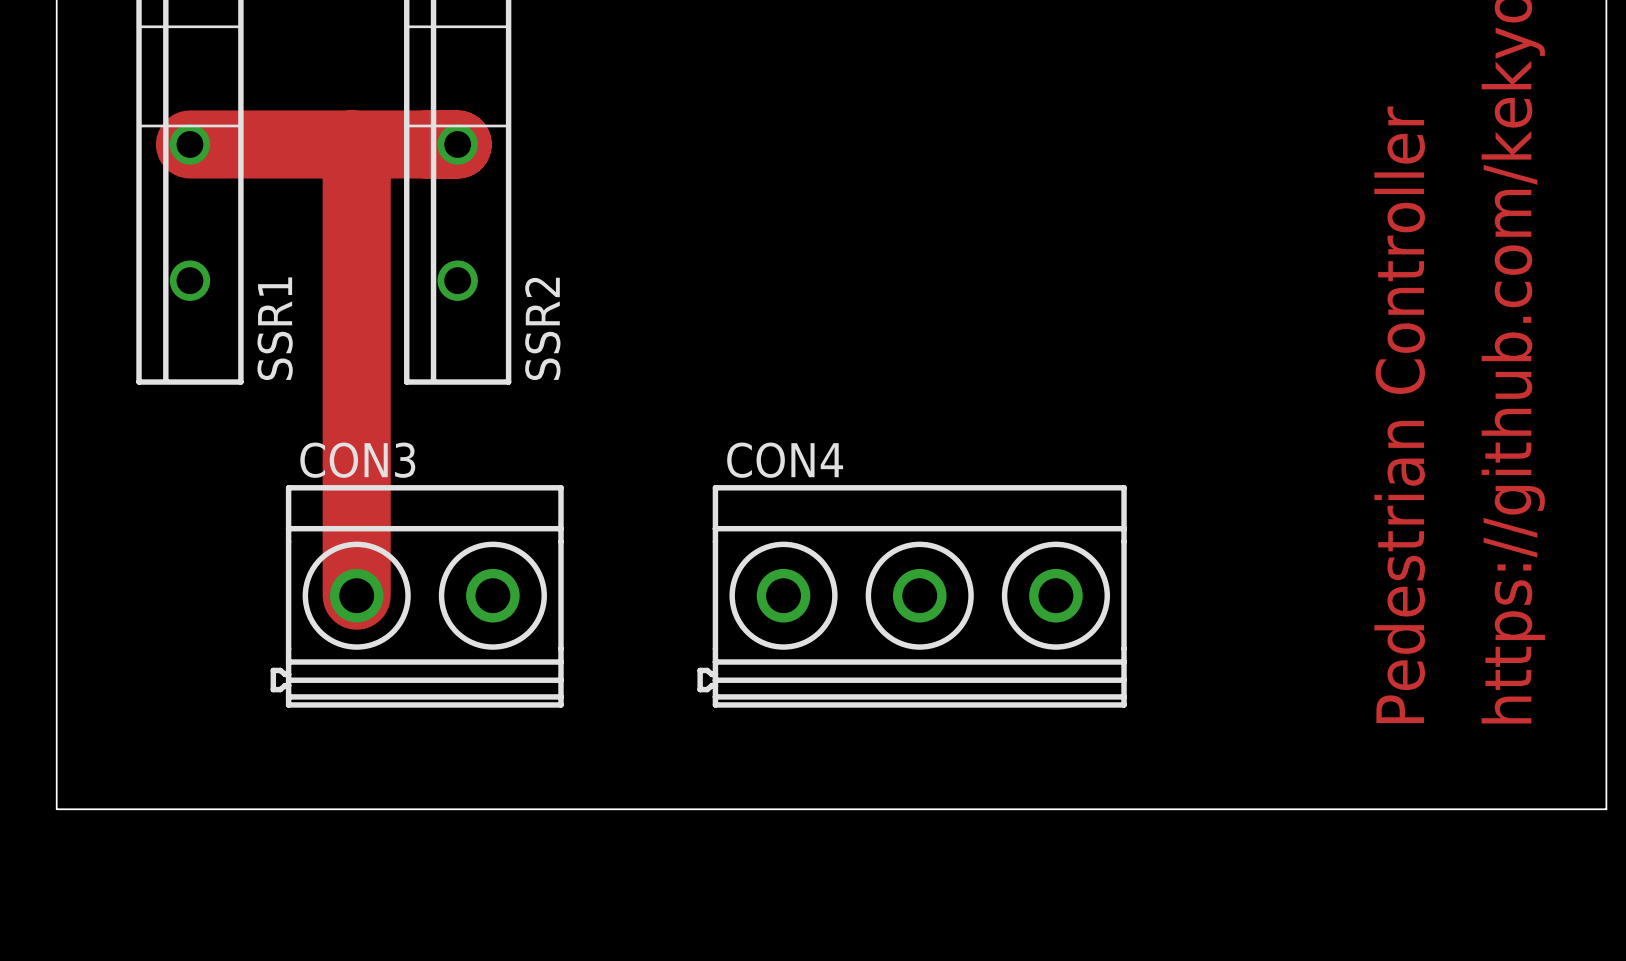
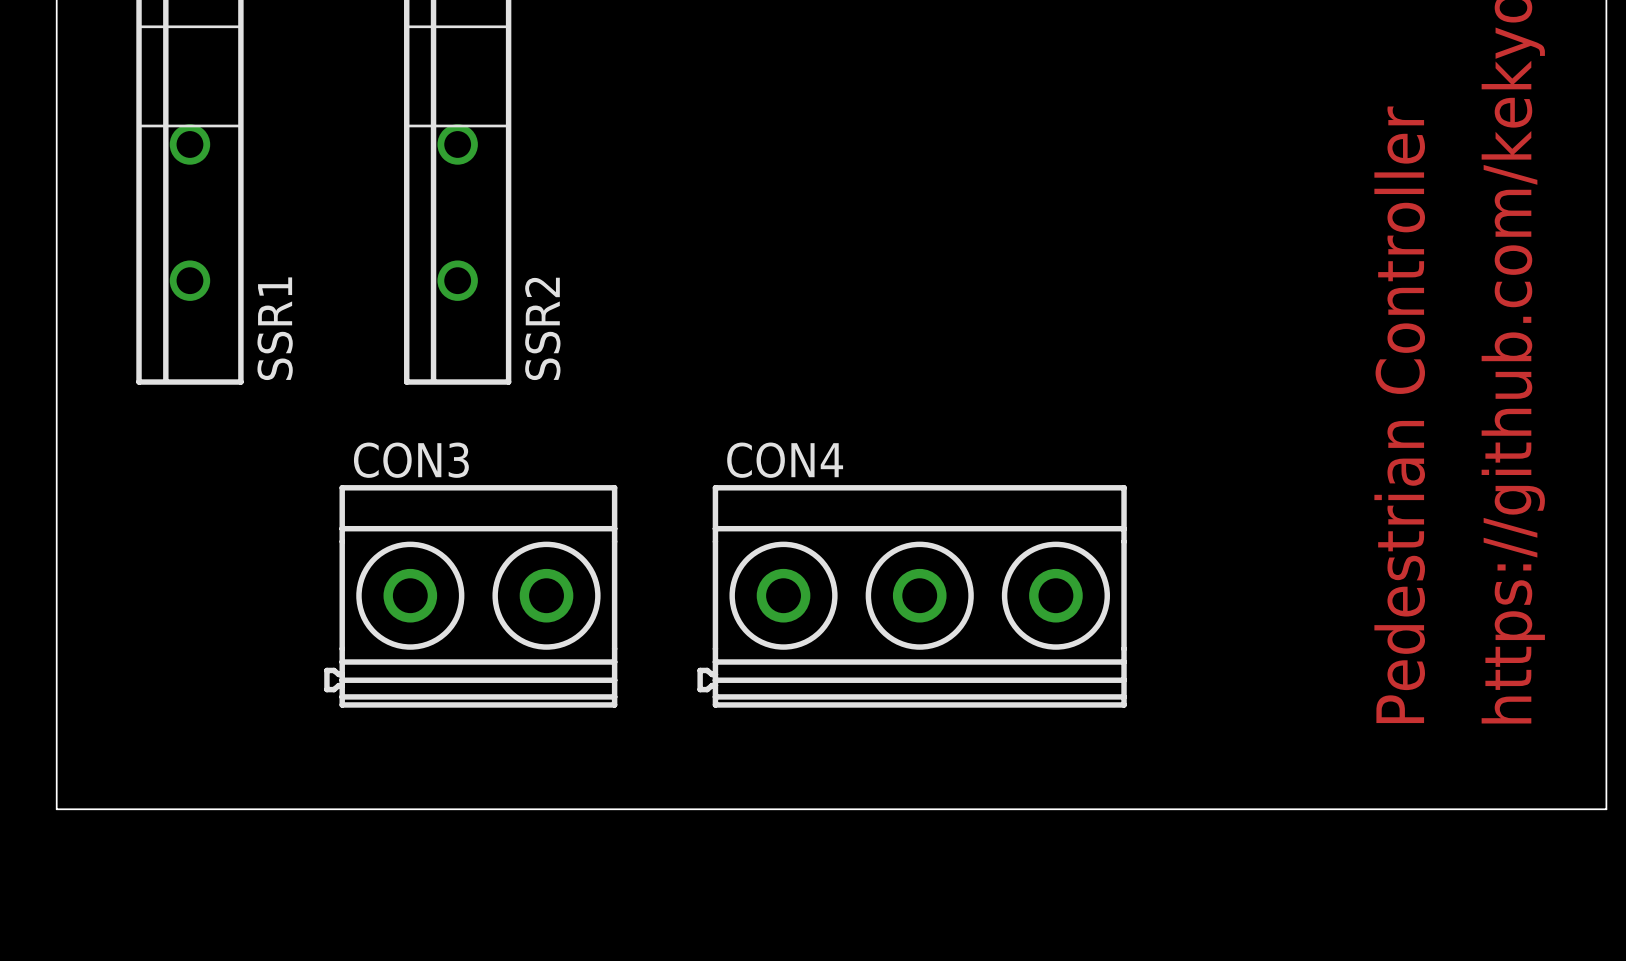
track: (189, 144) (457, 144) -> none
track: (351, 144) (356, 149) (356, 595) -> none
CON3 position: (417, 596) -> (470, 596)

